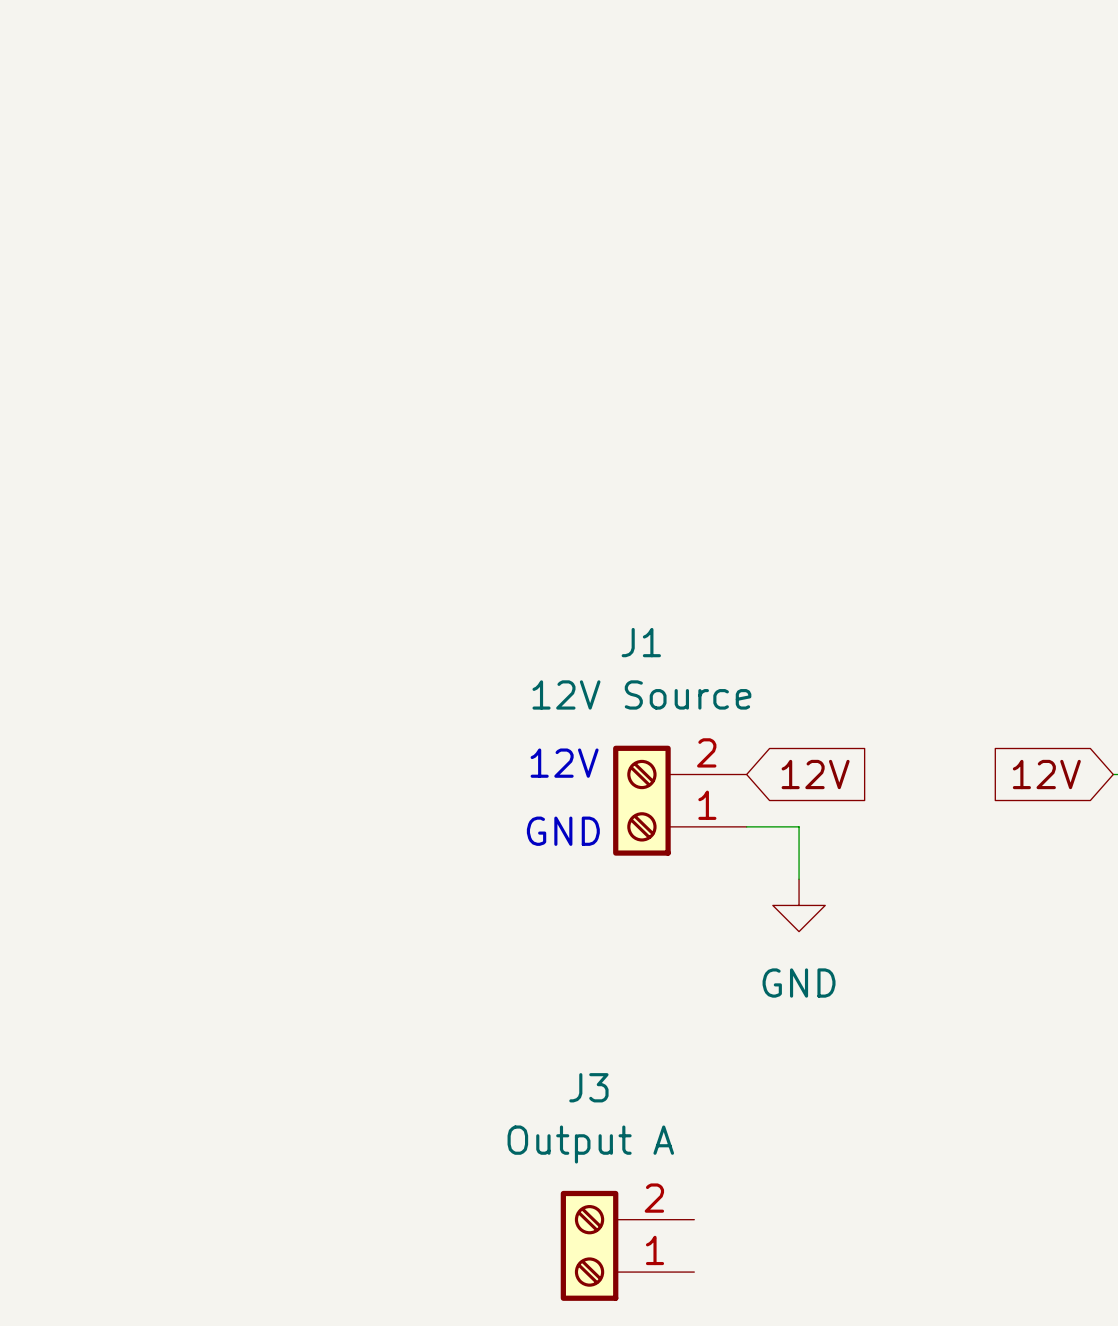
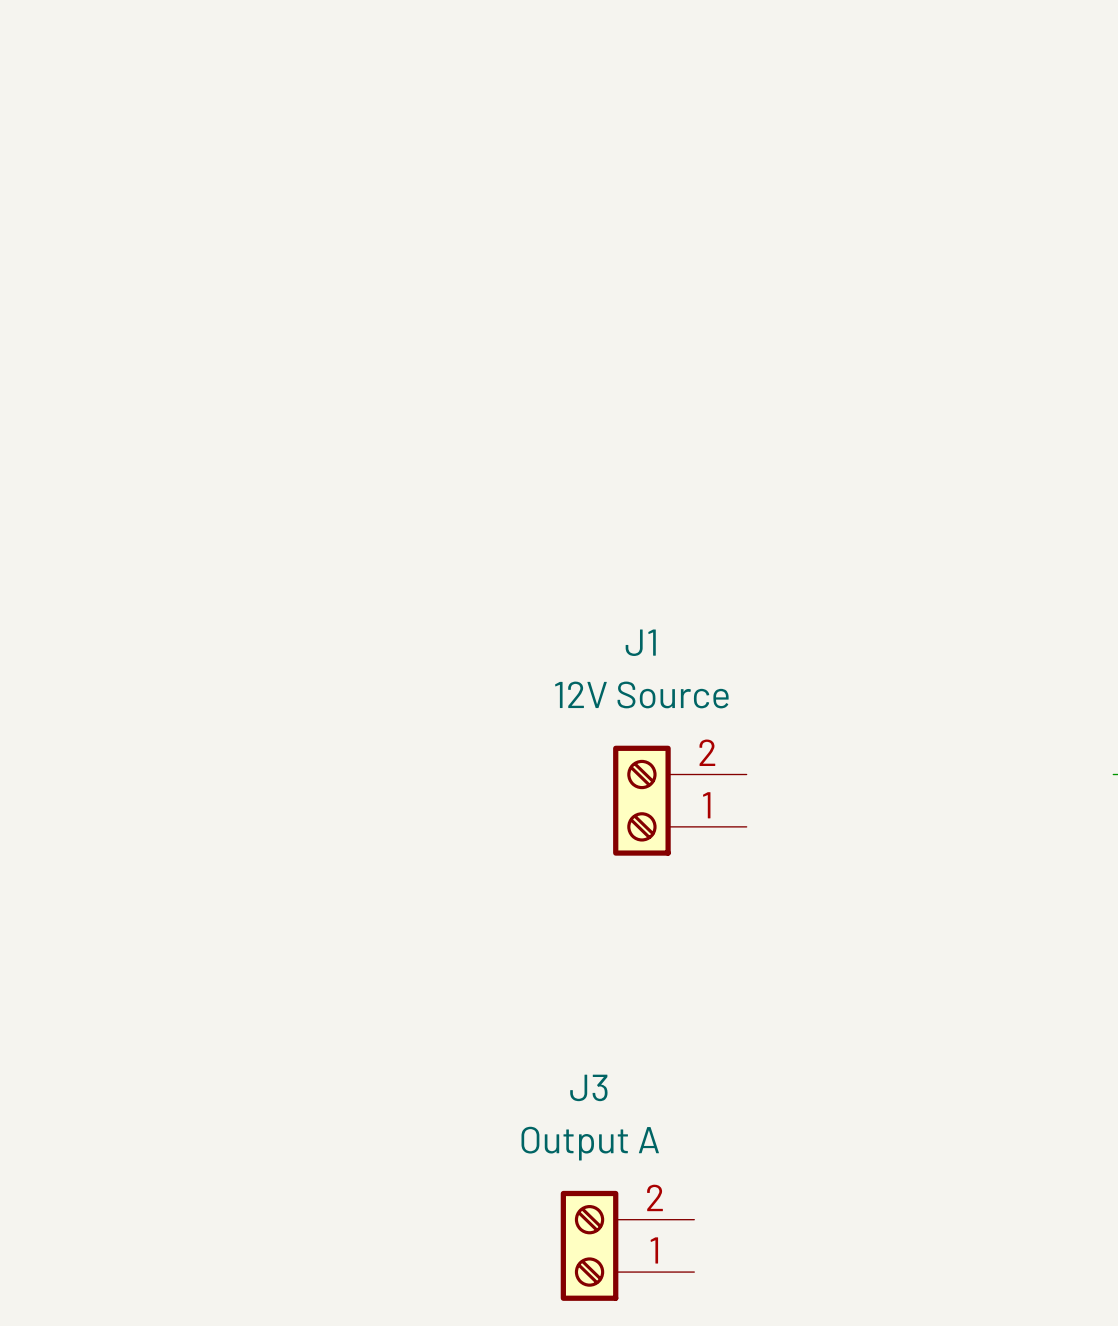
text: 12V (564, 763) -> none
global label: 12V (815, 774) -> none
global label: 12V (1046, 774) -> none
wire: (746, 826) (799, 826) (799, 879) -> none
text: GND (563, 831) -> none
power symbol: GND (799, 905) -> none

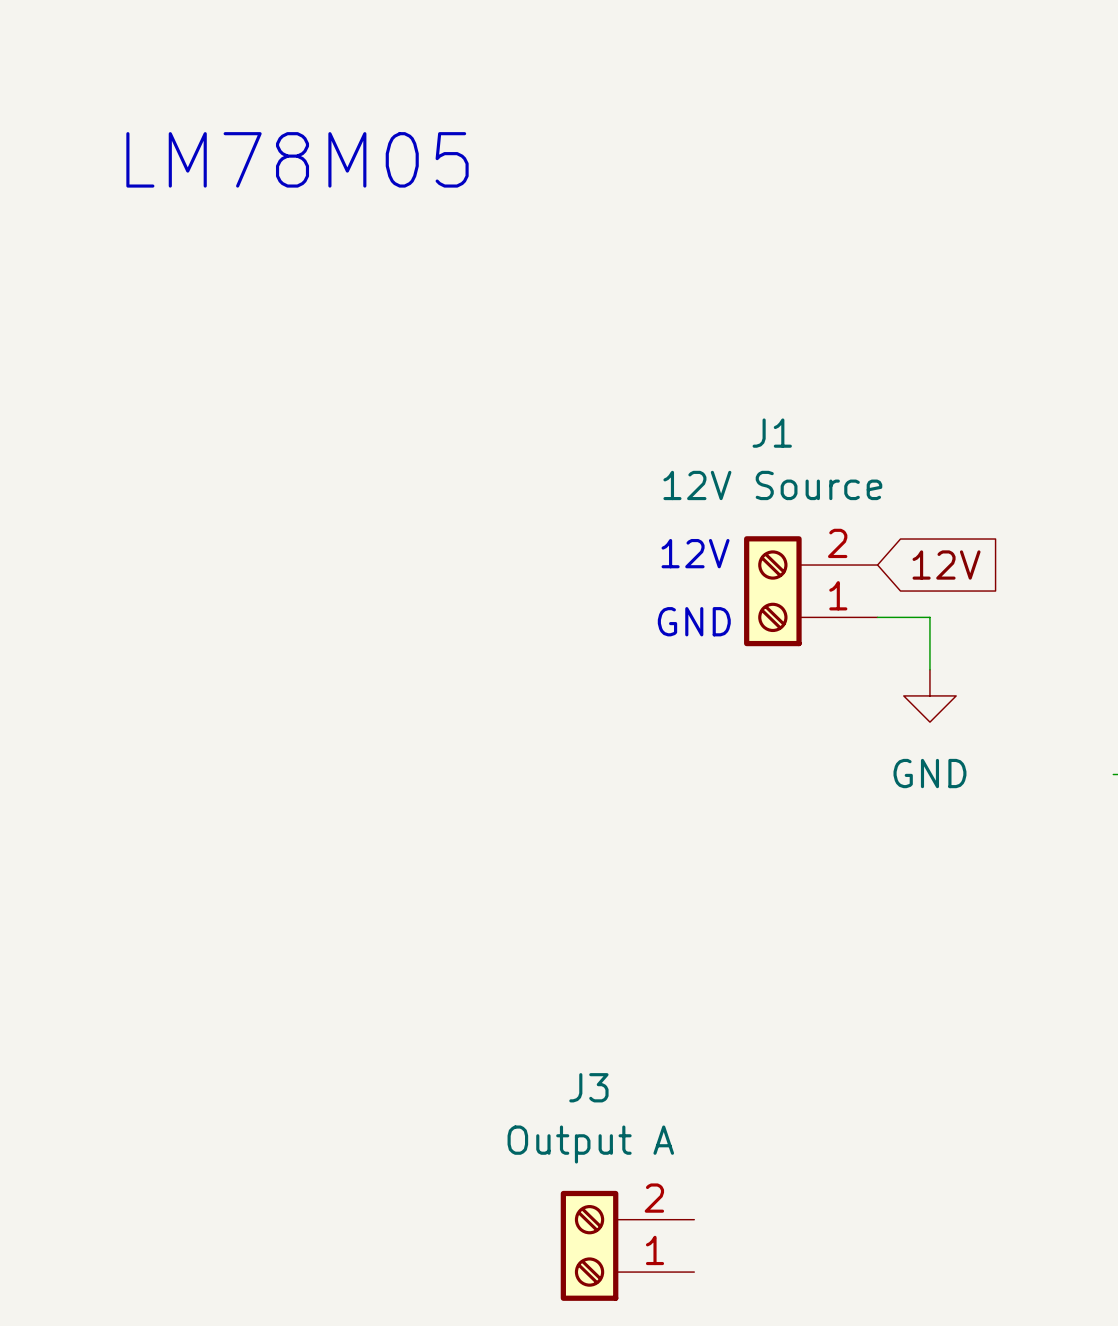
text: none -> LM78M05 (297, 159)
text: none -> 12V (695, 553)
global label: none -> 12V (946, 565)
wire: none -> (877, 617) (929, 617) (929, 669)
text: none -> GND (694, 621)
power symbol: none -> GND (929, 695)
J1 position: (679, 800) -> (810, 591)

